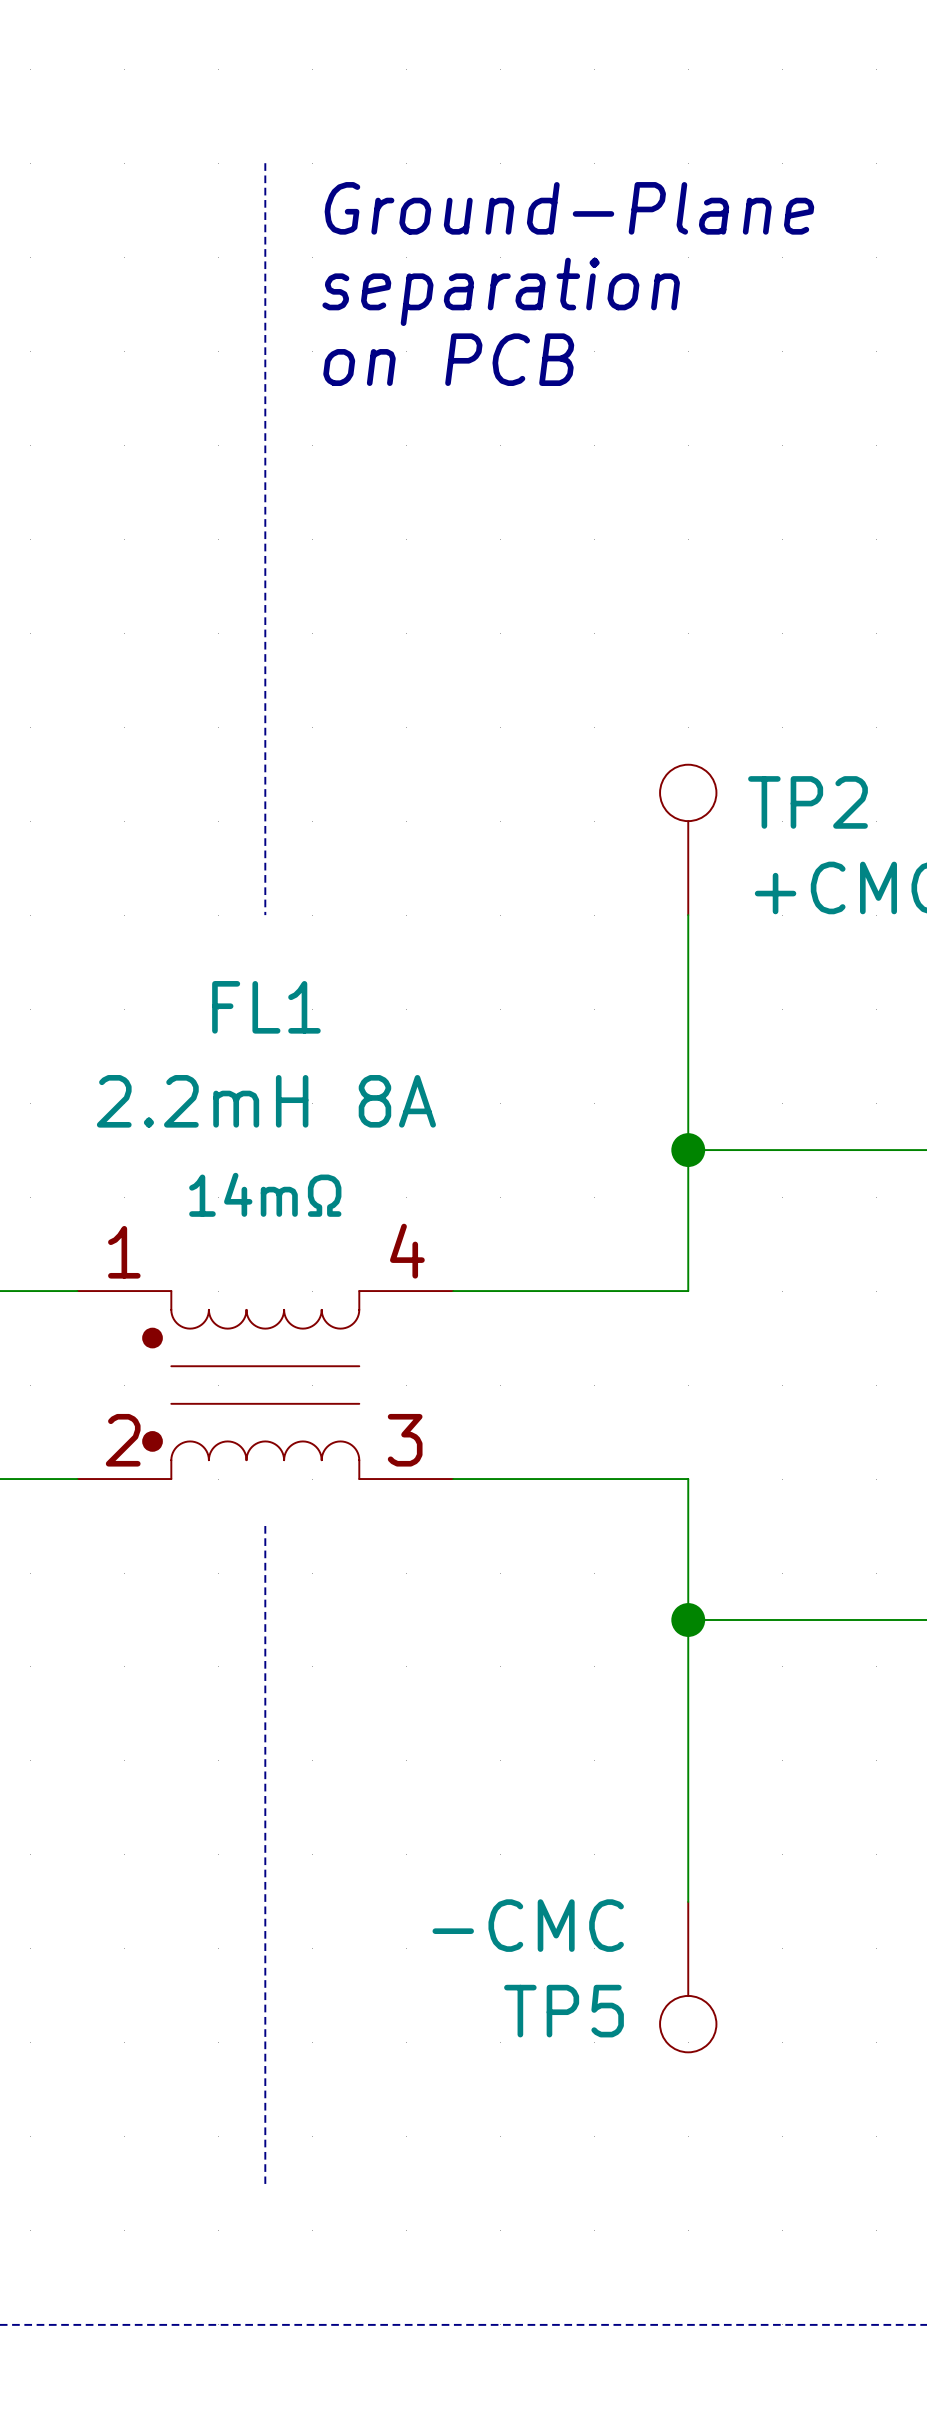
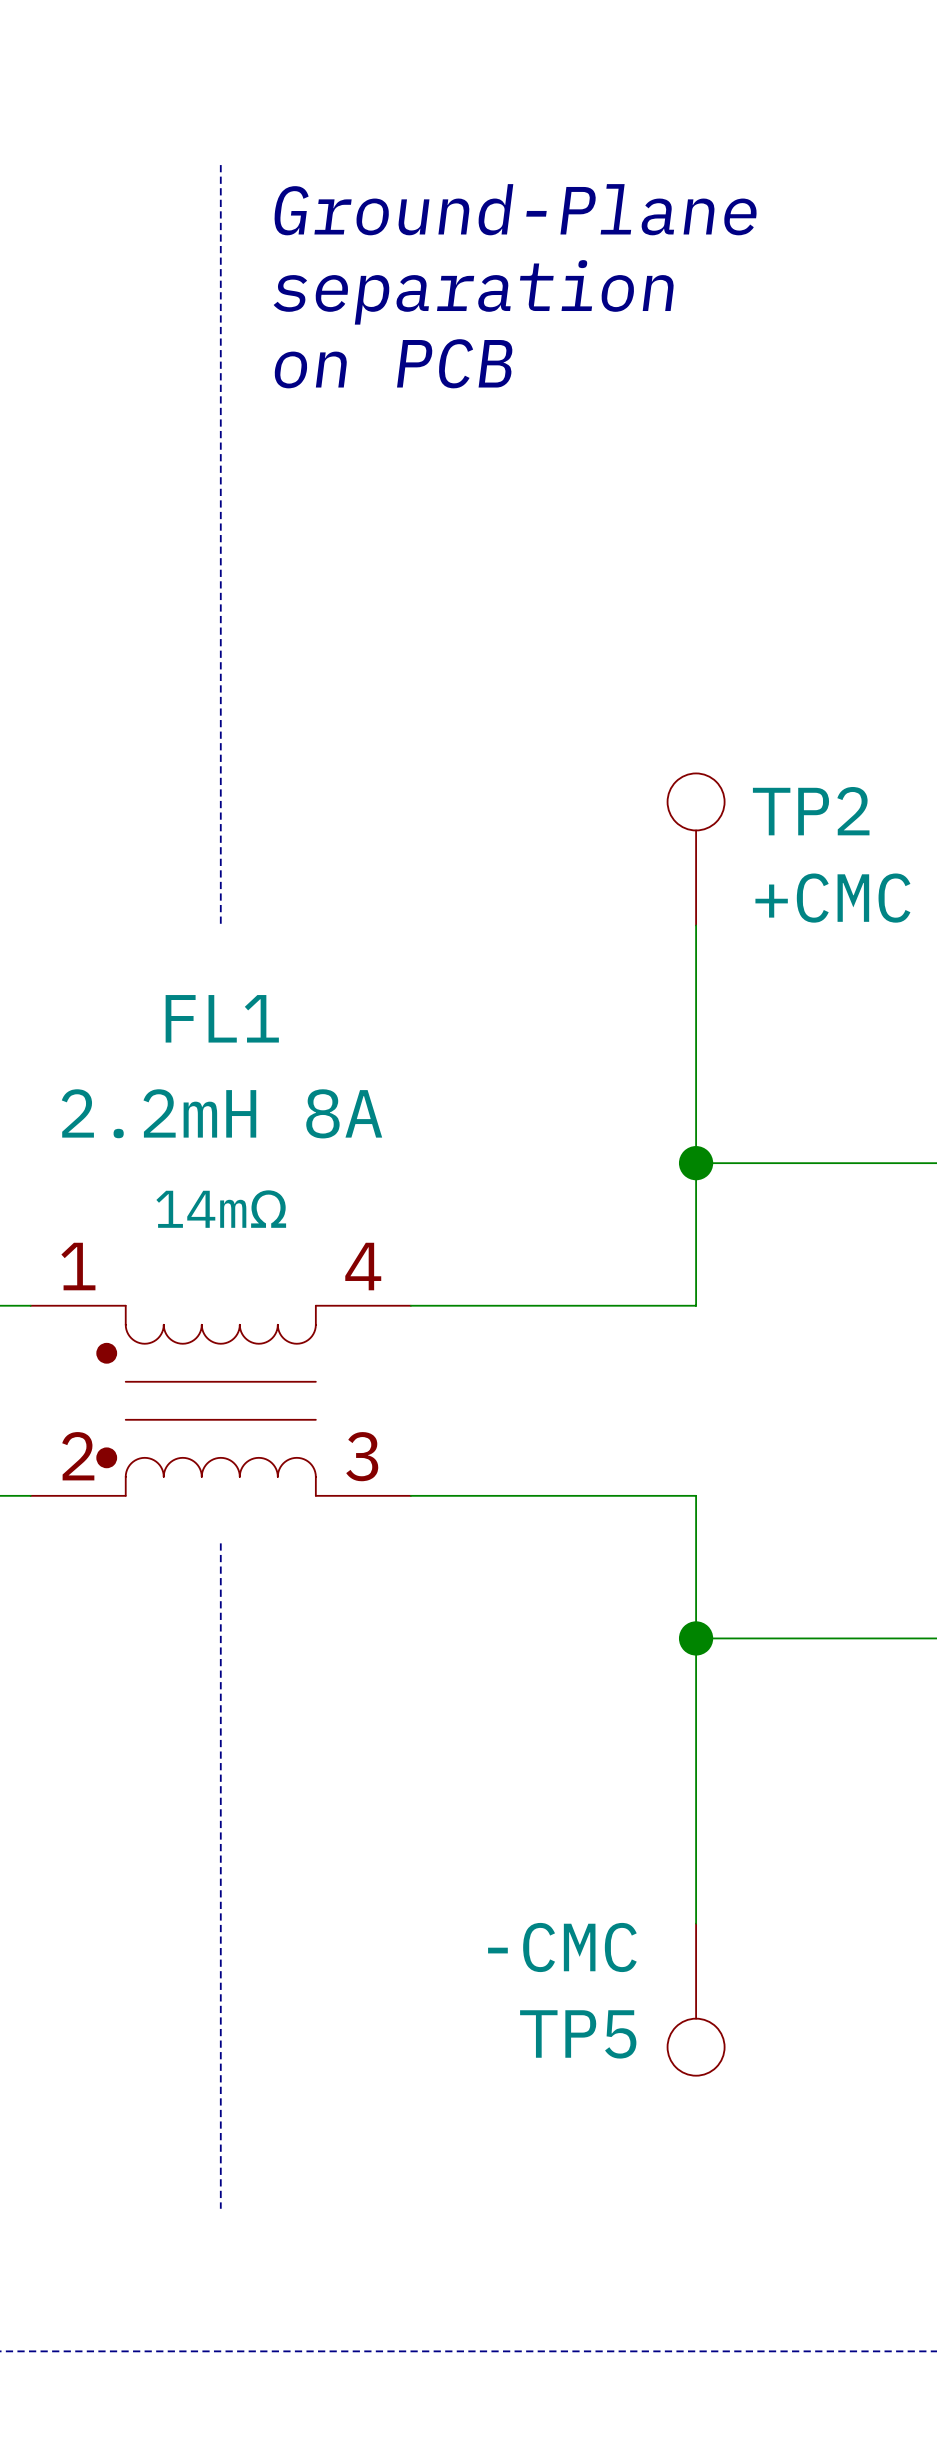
line: (265, 163) (265, 915) -> (220, 165) (220, 925)
text position: Ground-Plane (569, 208) -> Ground-Plane (515, 209)
text position: separation (501, 291) -> separation (473, 292)
text position: on PCB (448, 359) -> on PCB (393, 363)
FL1 position: (265, 1385) -> (220, 1400)
line: (265, 1526) (265, 2183) -> (220, 1543) (220, 2208)

